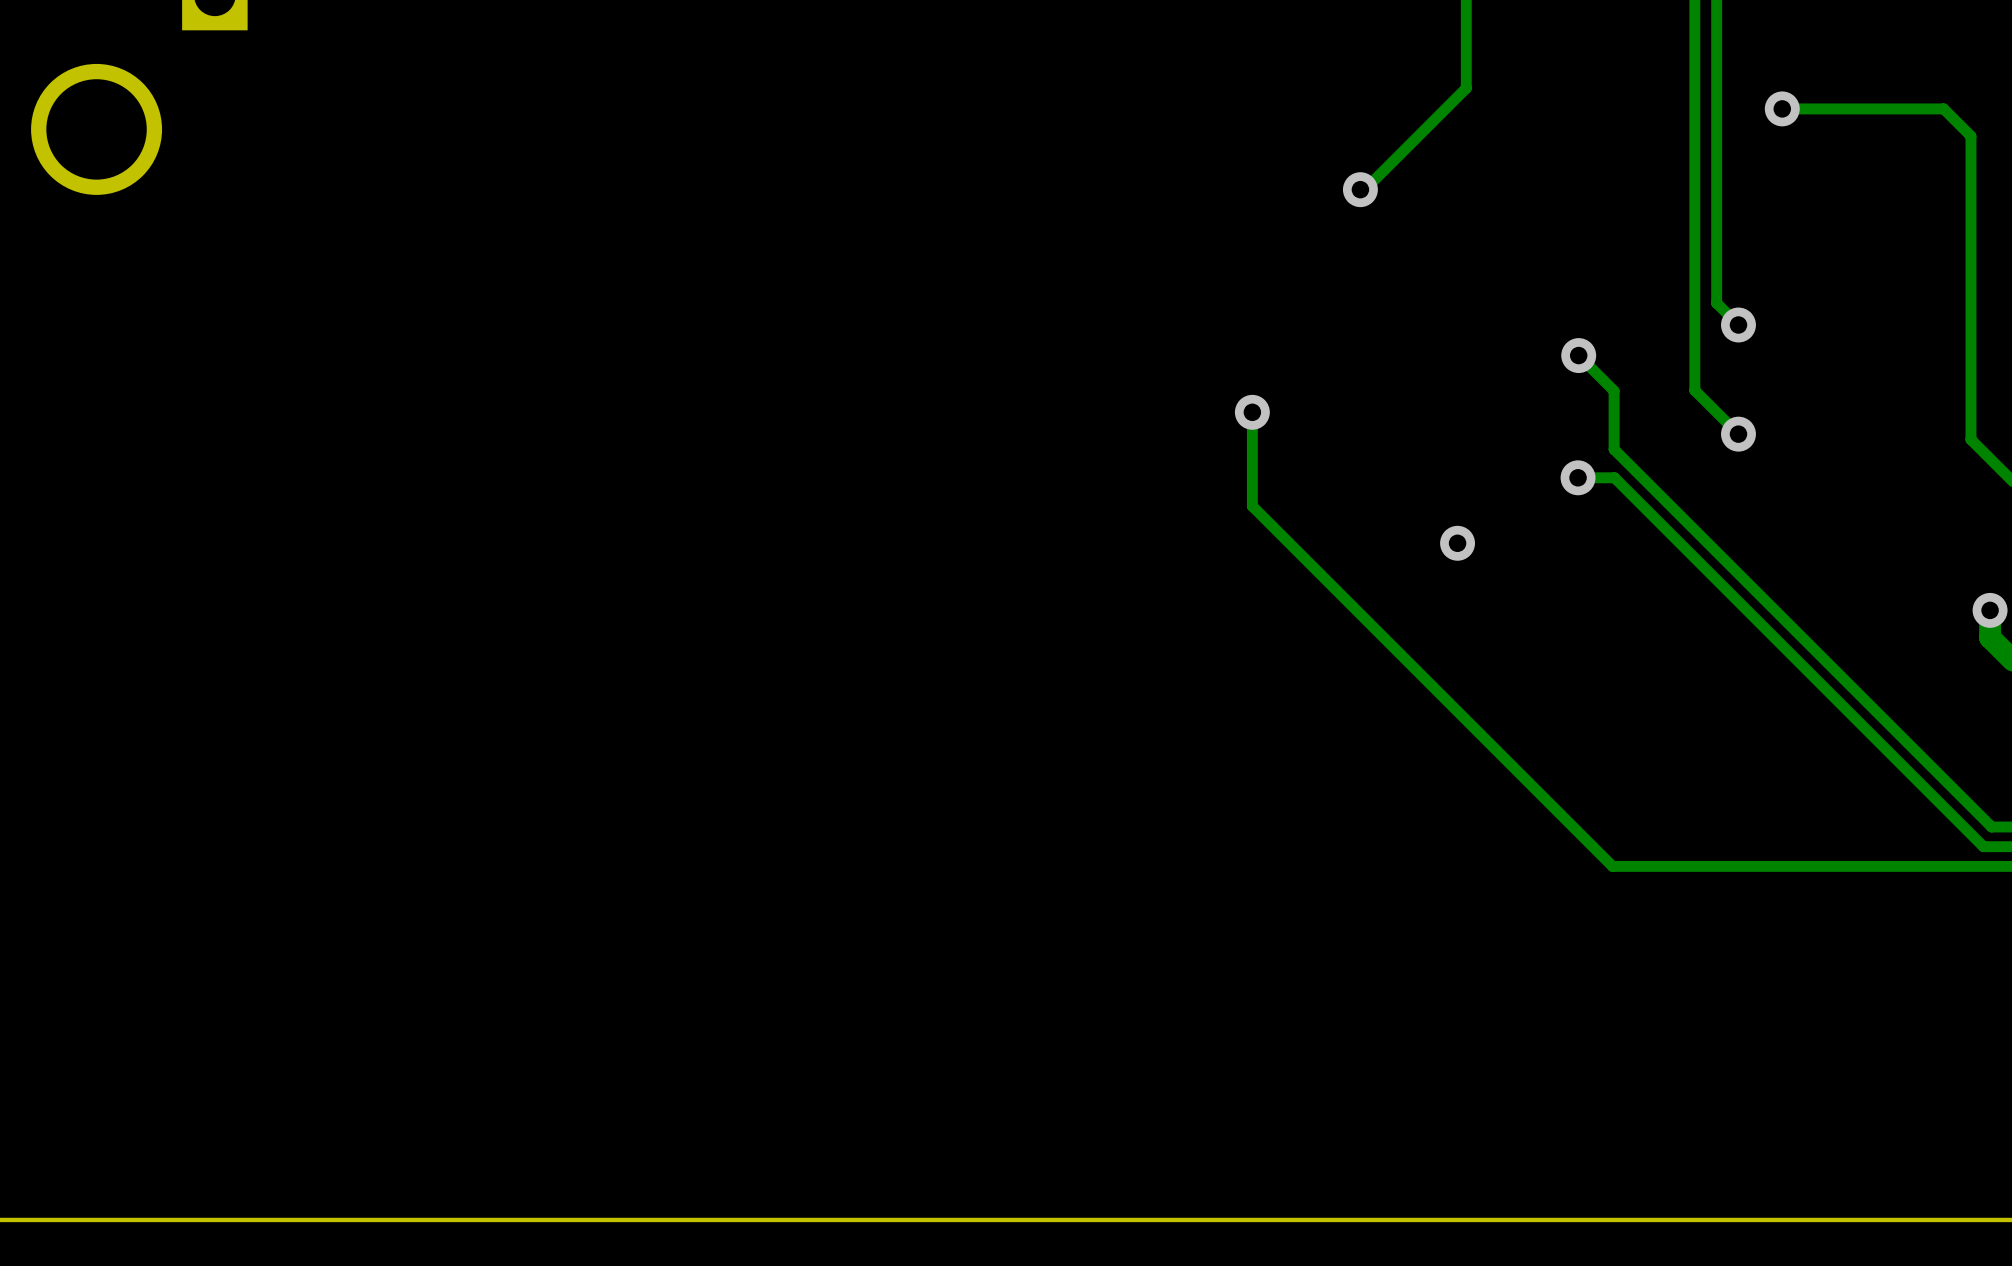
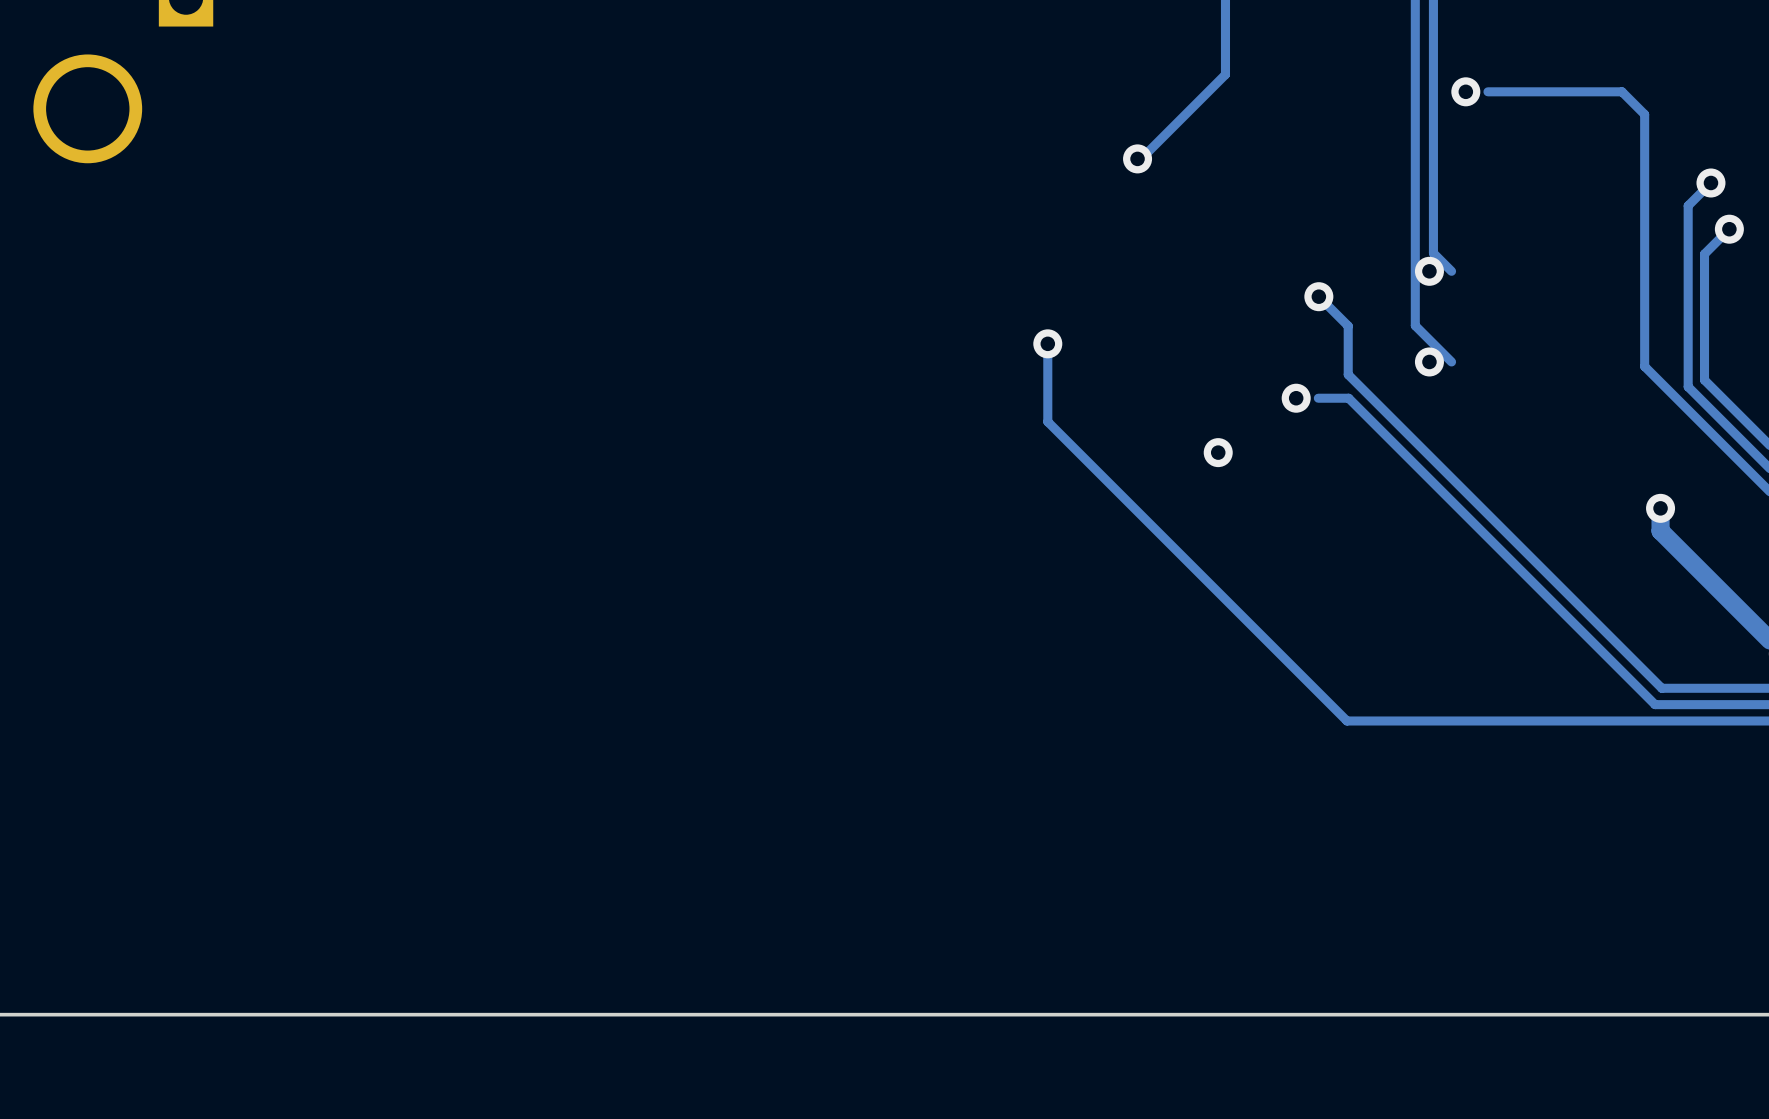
via position: (1782, 108) -> (1465, 91)
via position: (1738, 325) -> (1429, 271)
via position: (1738, 434) -> (1429, 361)
via position: (1578, 477) -> (1296, 398)

